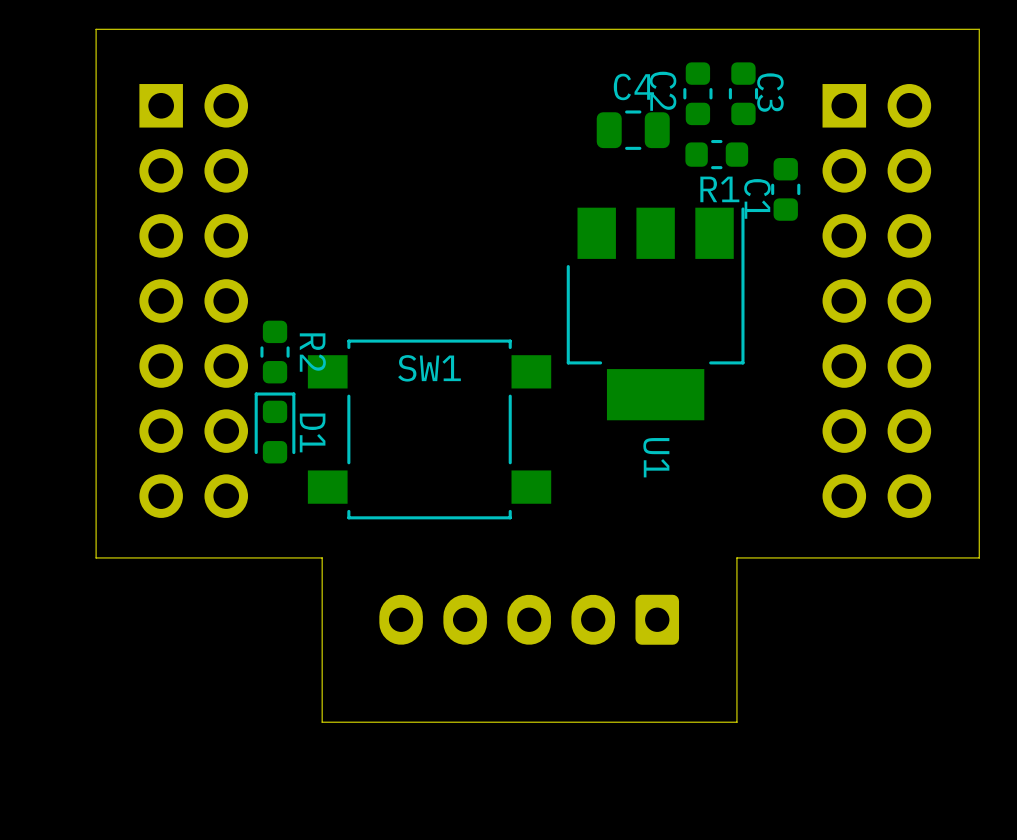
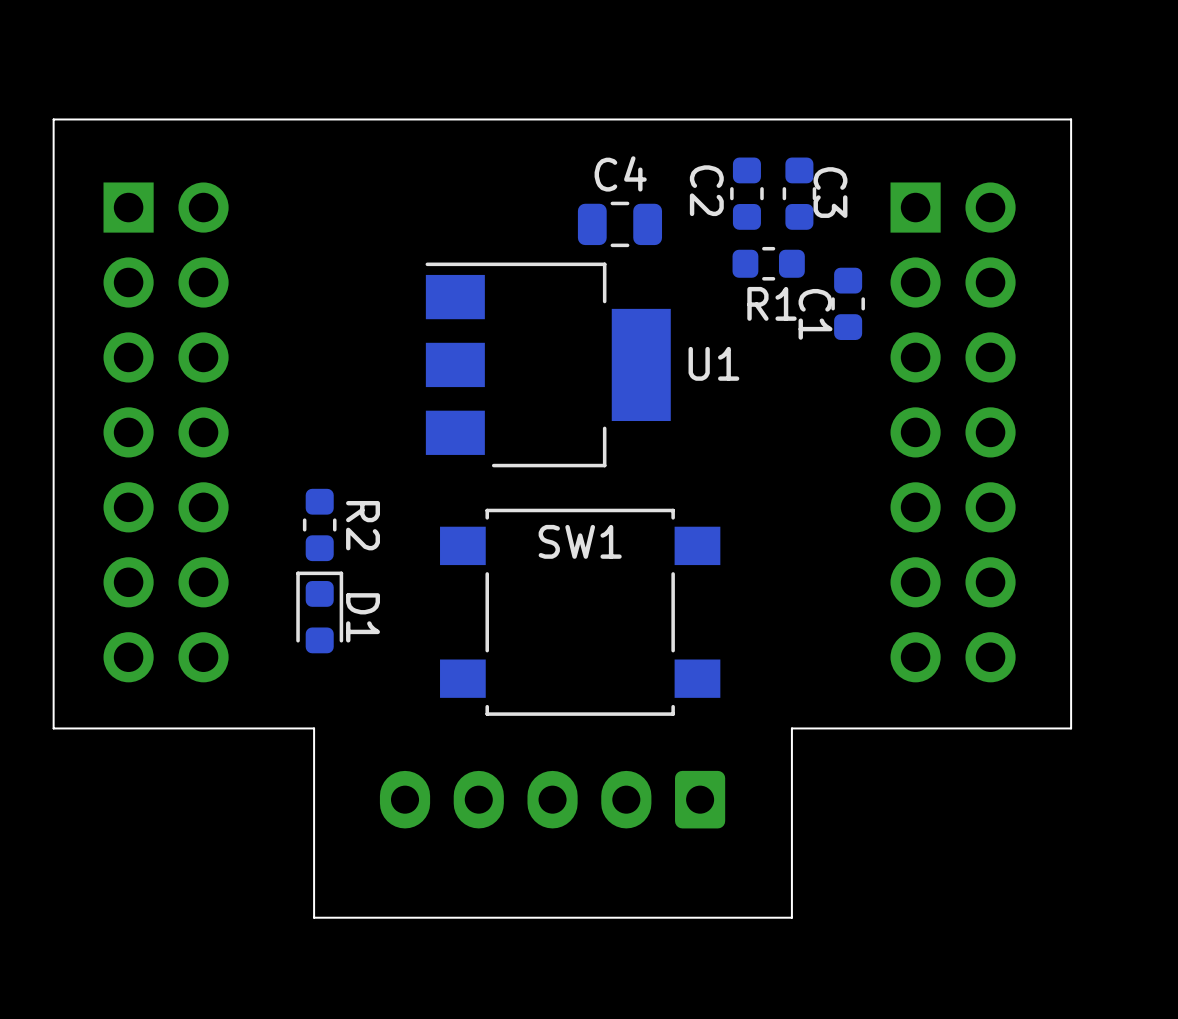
C4 position: (633, 130) -> (619, 224)
U1 rotation: 0° (655, 313) -> 90° counterclockwise (548, 364)
U1 position: (655, 313) -> (548, 364)
R2 position: (275, 352) -> (319, 524)
D1 position: (275, 427) -> (319, 612)
SW1 position: (429, 429) -> (580, 612)

